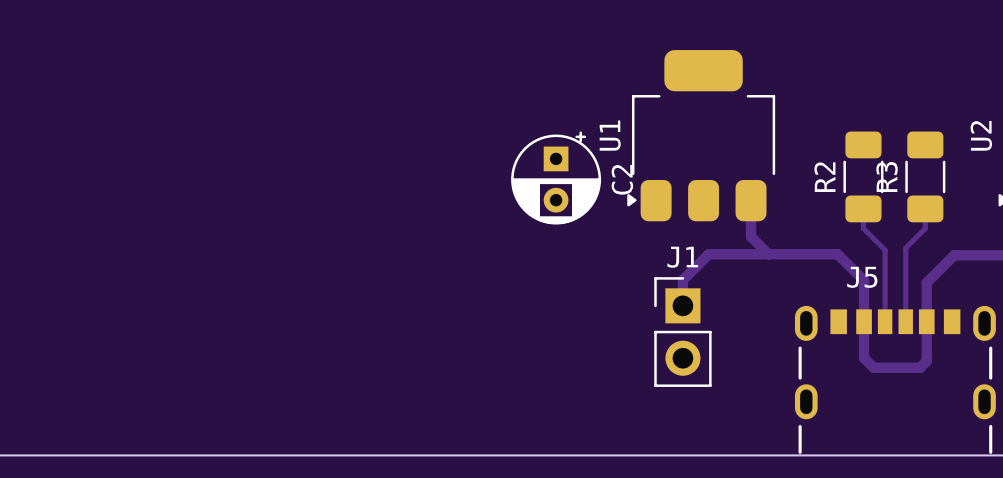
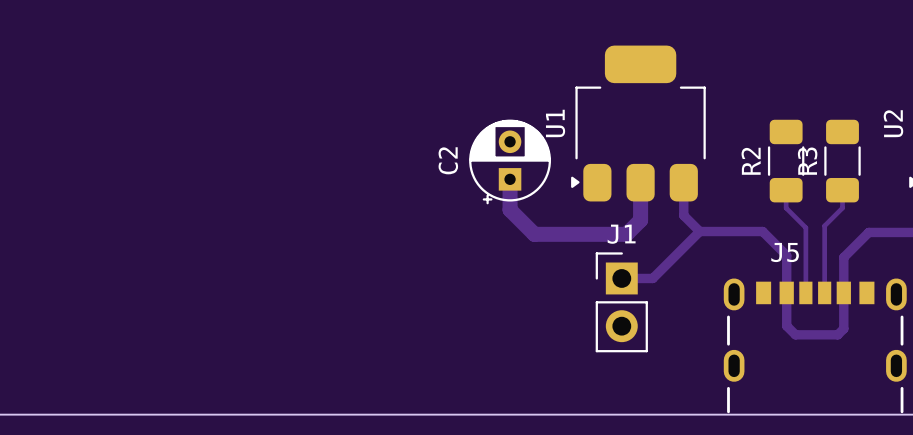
C2 rotation: 0° (556, 178) -> 180° (510, 161)
track: none -> (510, 179) (510, 209) (534, 234) (626, 234) (640, 220) (640, 182)
track: (768, 254) (708, 254) (682, 280) (682, 305) -> (699, 231) (652, 278) (621, 278)

